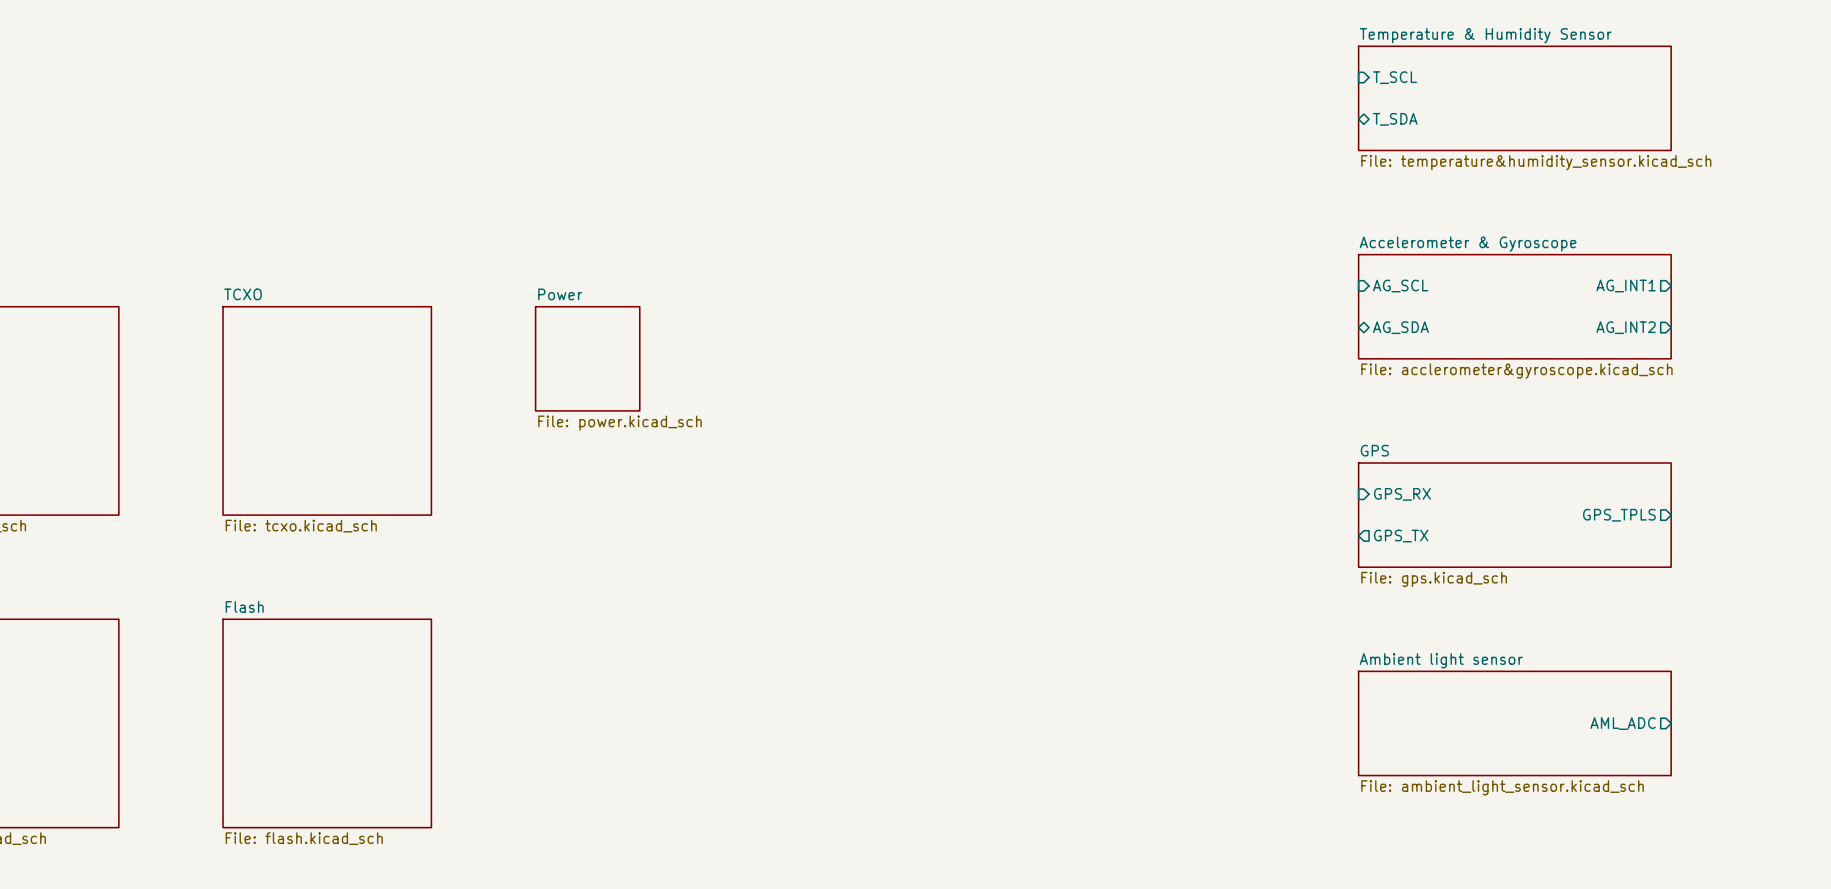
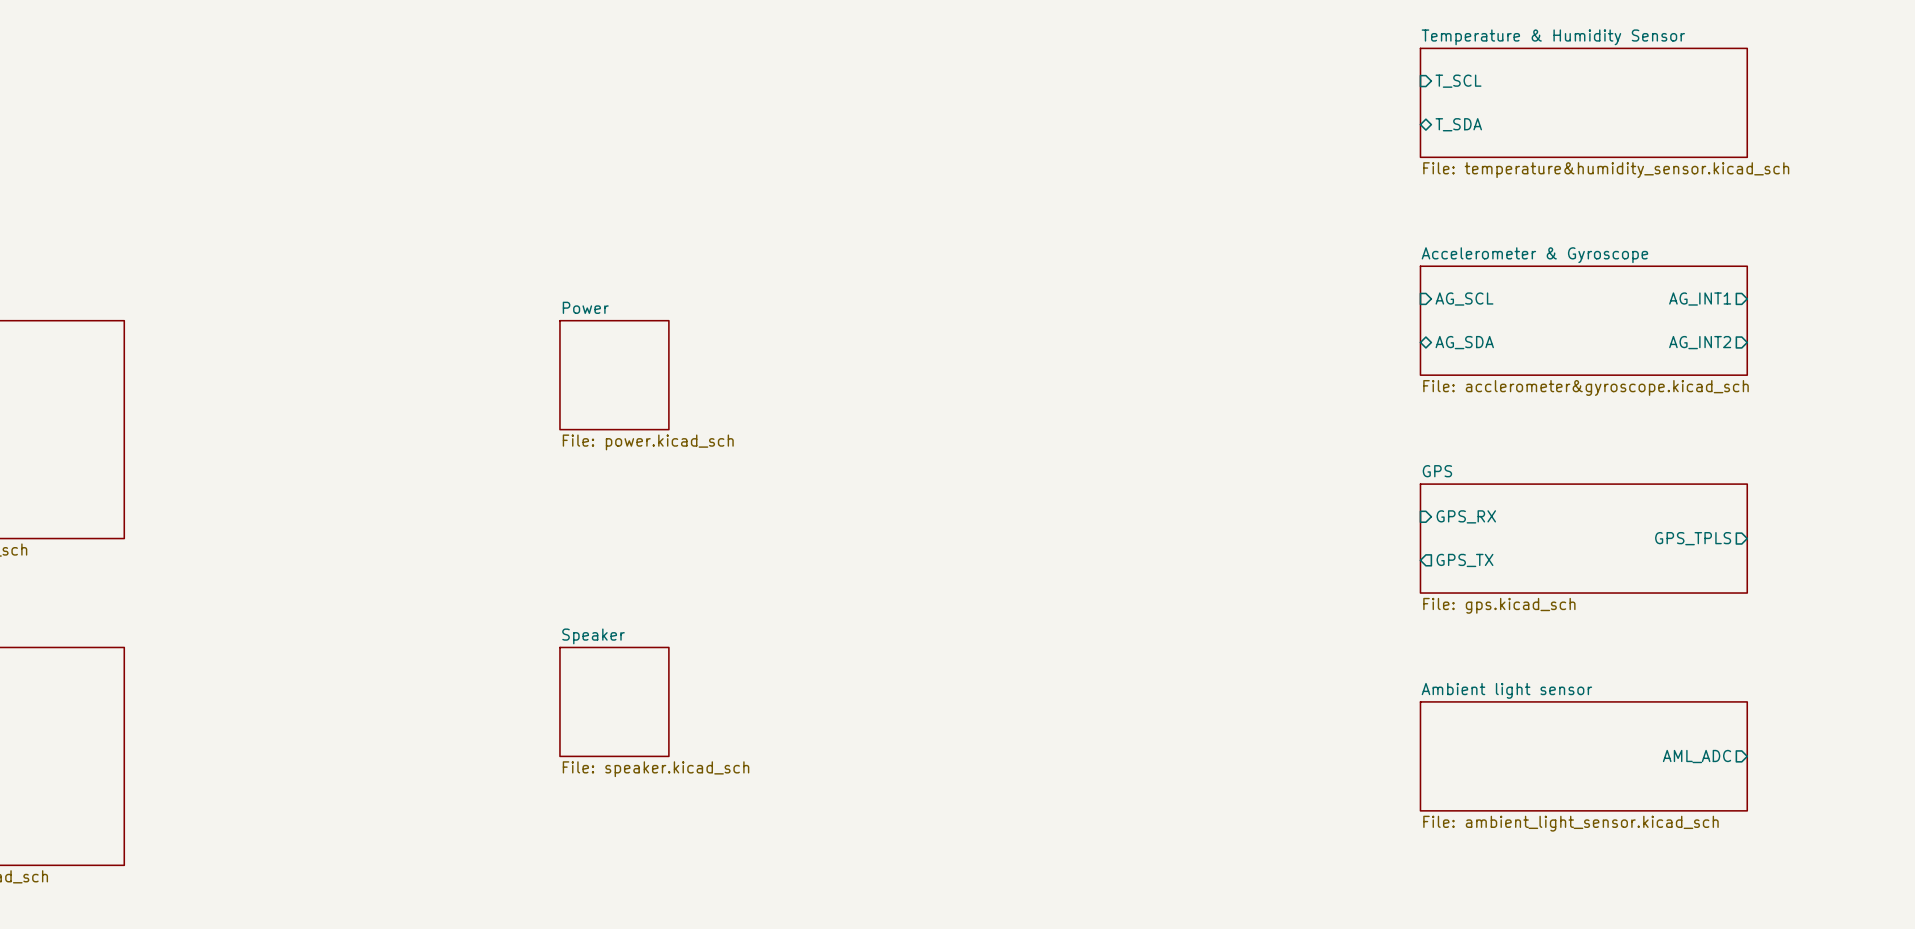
sheet TCXO: File: tcxo.kicad_sch (327, 410) -> none
sheet Speaker: none -> File: speaker.kicad_sch (614, 701)
sheet Flash: File: flash.kicad_sch (327, 723) -> none

